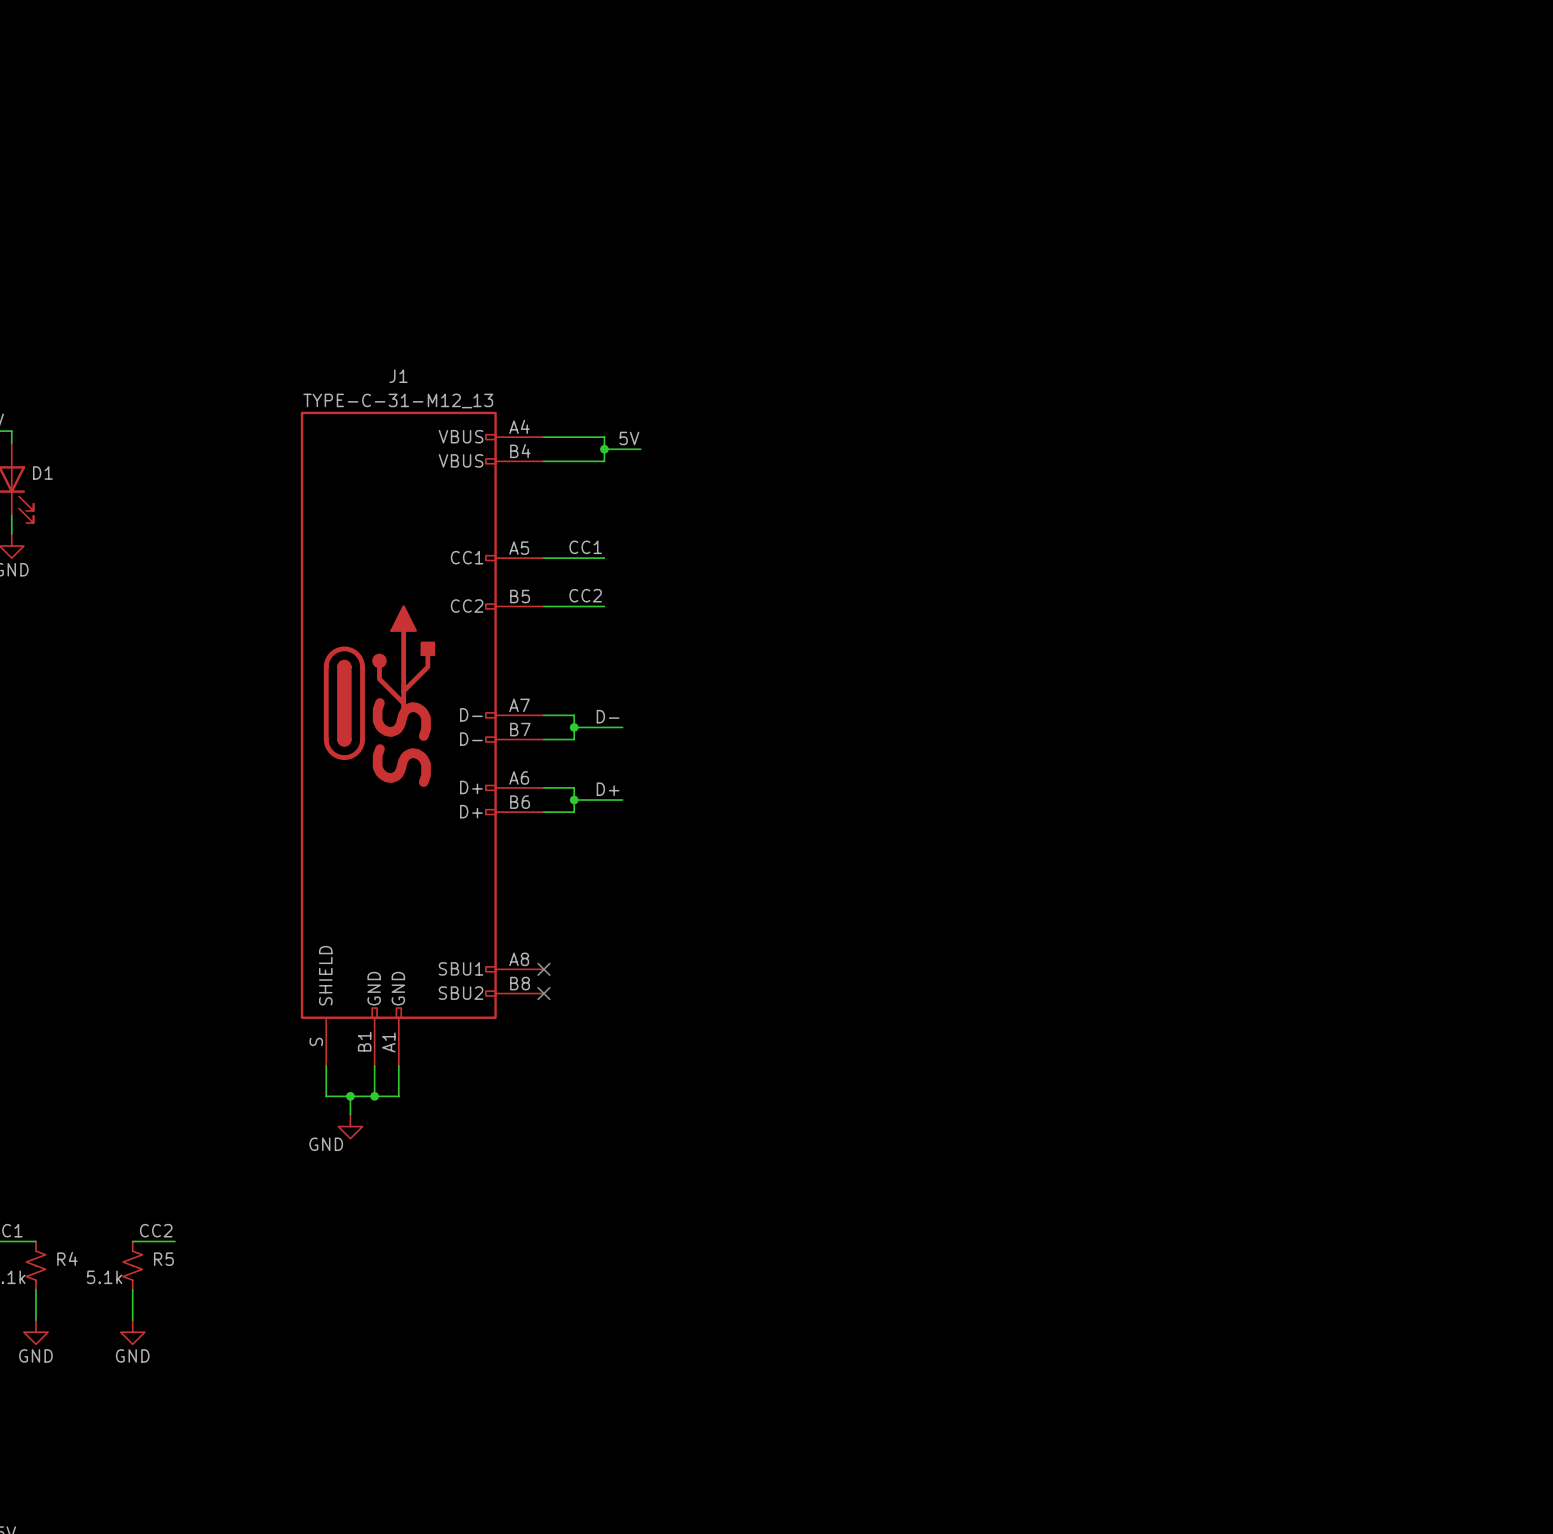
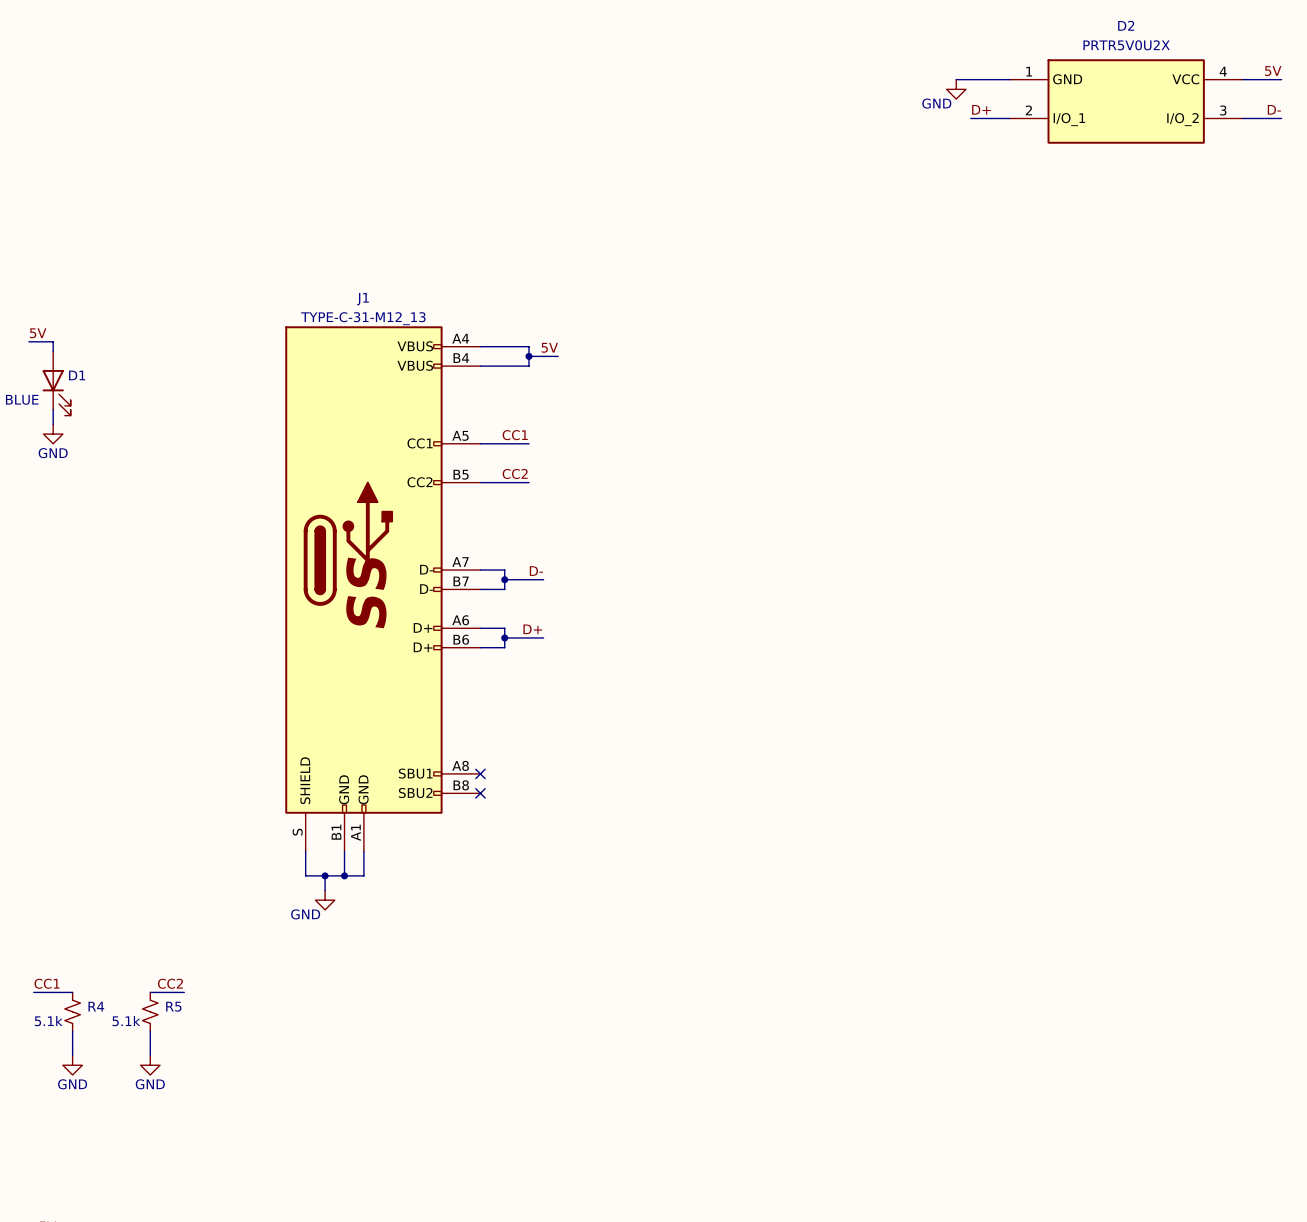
label: none -> 5V (1273, 71)
wire: none -> (956, 79) (1009, 79)
wire: none -> (1242, 79) (1281, 79)
power symbol: none -> GND (956, 89)
D2: none -> PRTR5V0U2X (1126, 101)
label: none -> D+ (981, 109)
label: none -> D- (1274, 109)
wire: none -> (970, 118) (1009, 118)
wire: none -> (1242, 118) (1281, 118)

